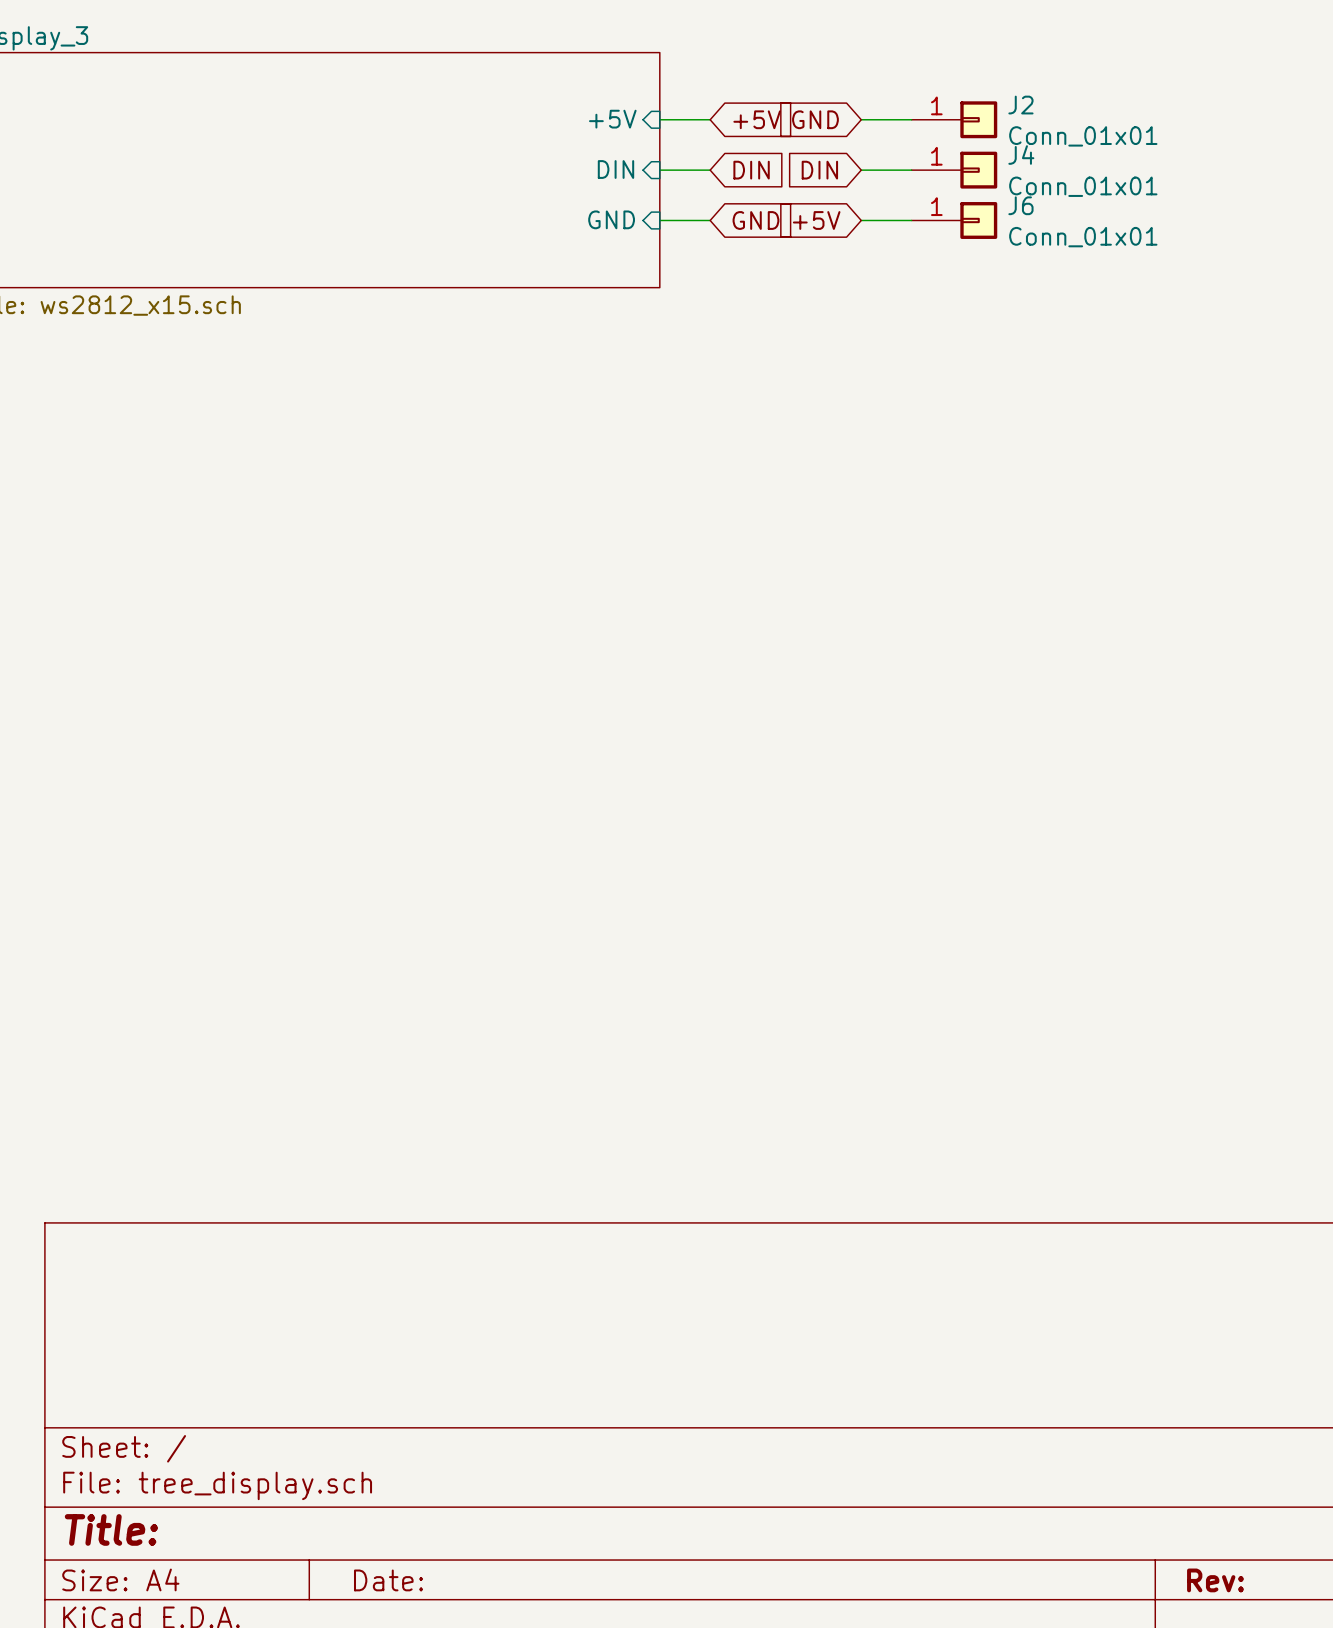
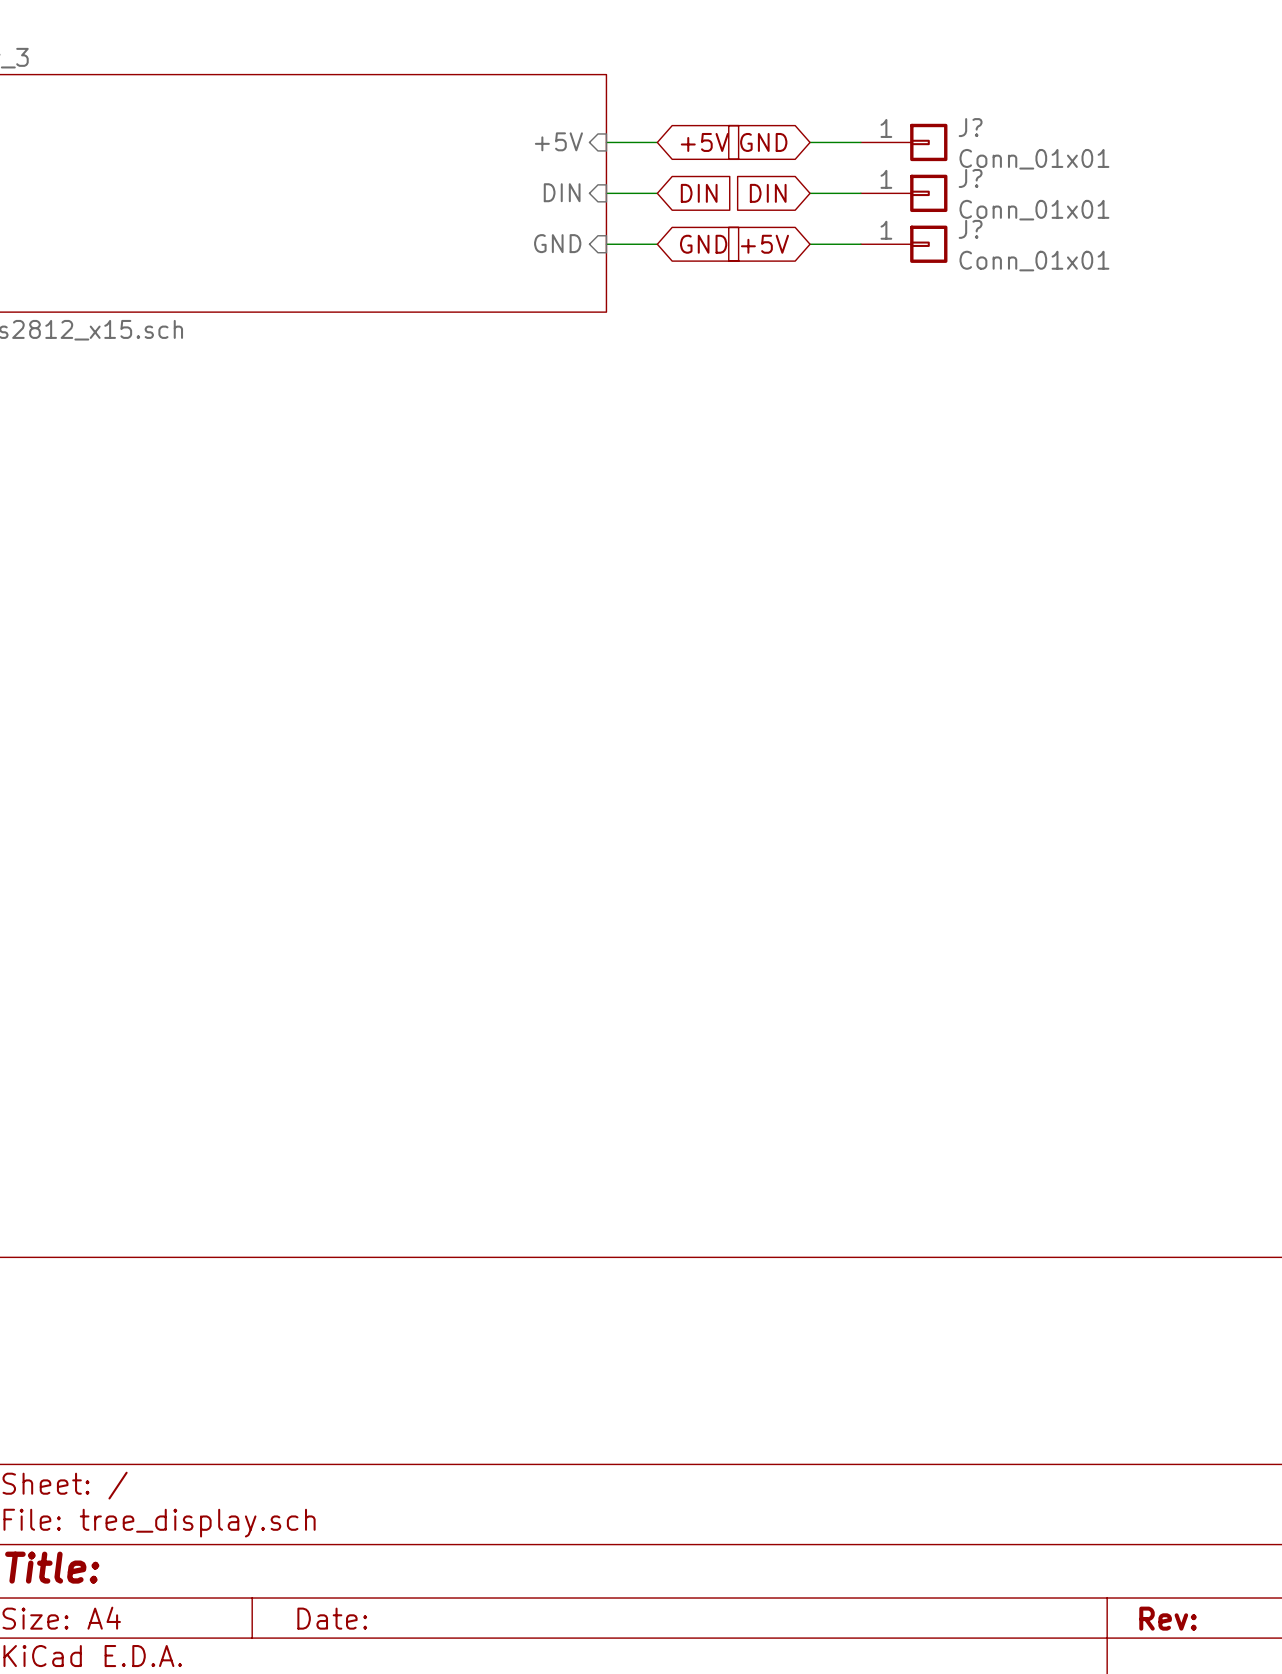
J2 name: J2 (1020, 105) -> J? (970, 127)
J4 name: J4 (1021, 155) -> J? (970, 178)
J6 name: J6 (1020, 205) -> J? (970, 229)

